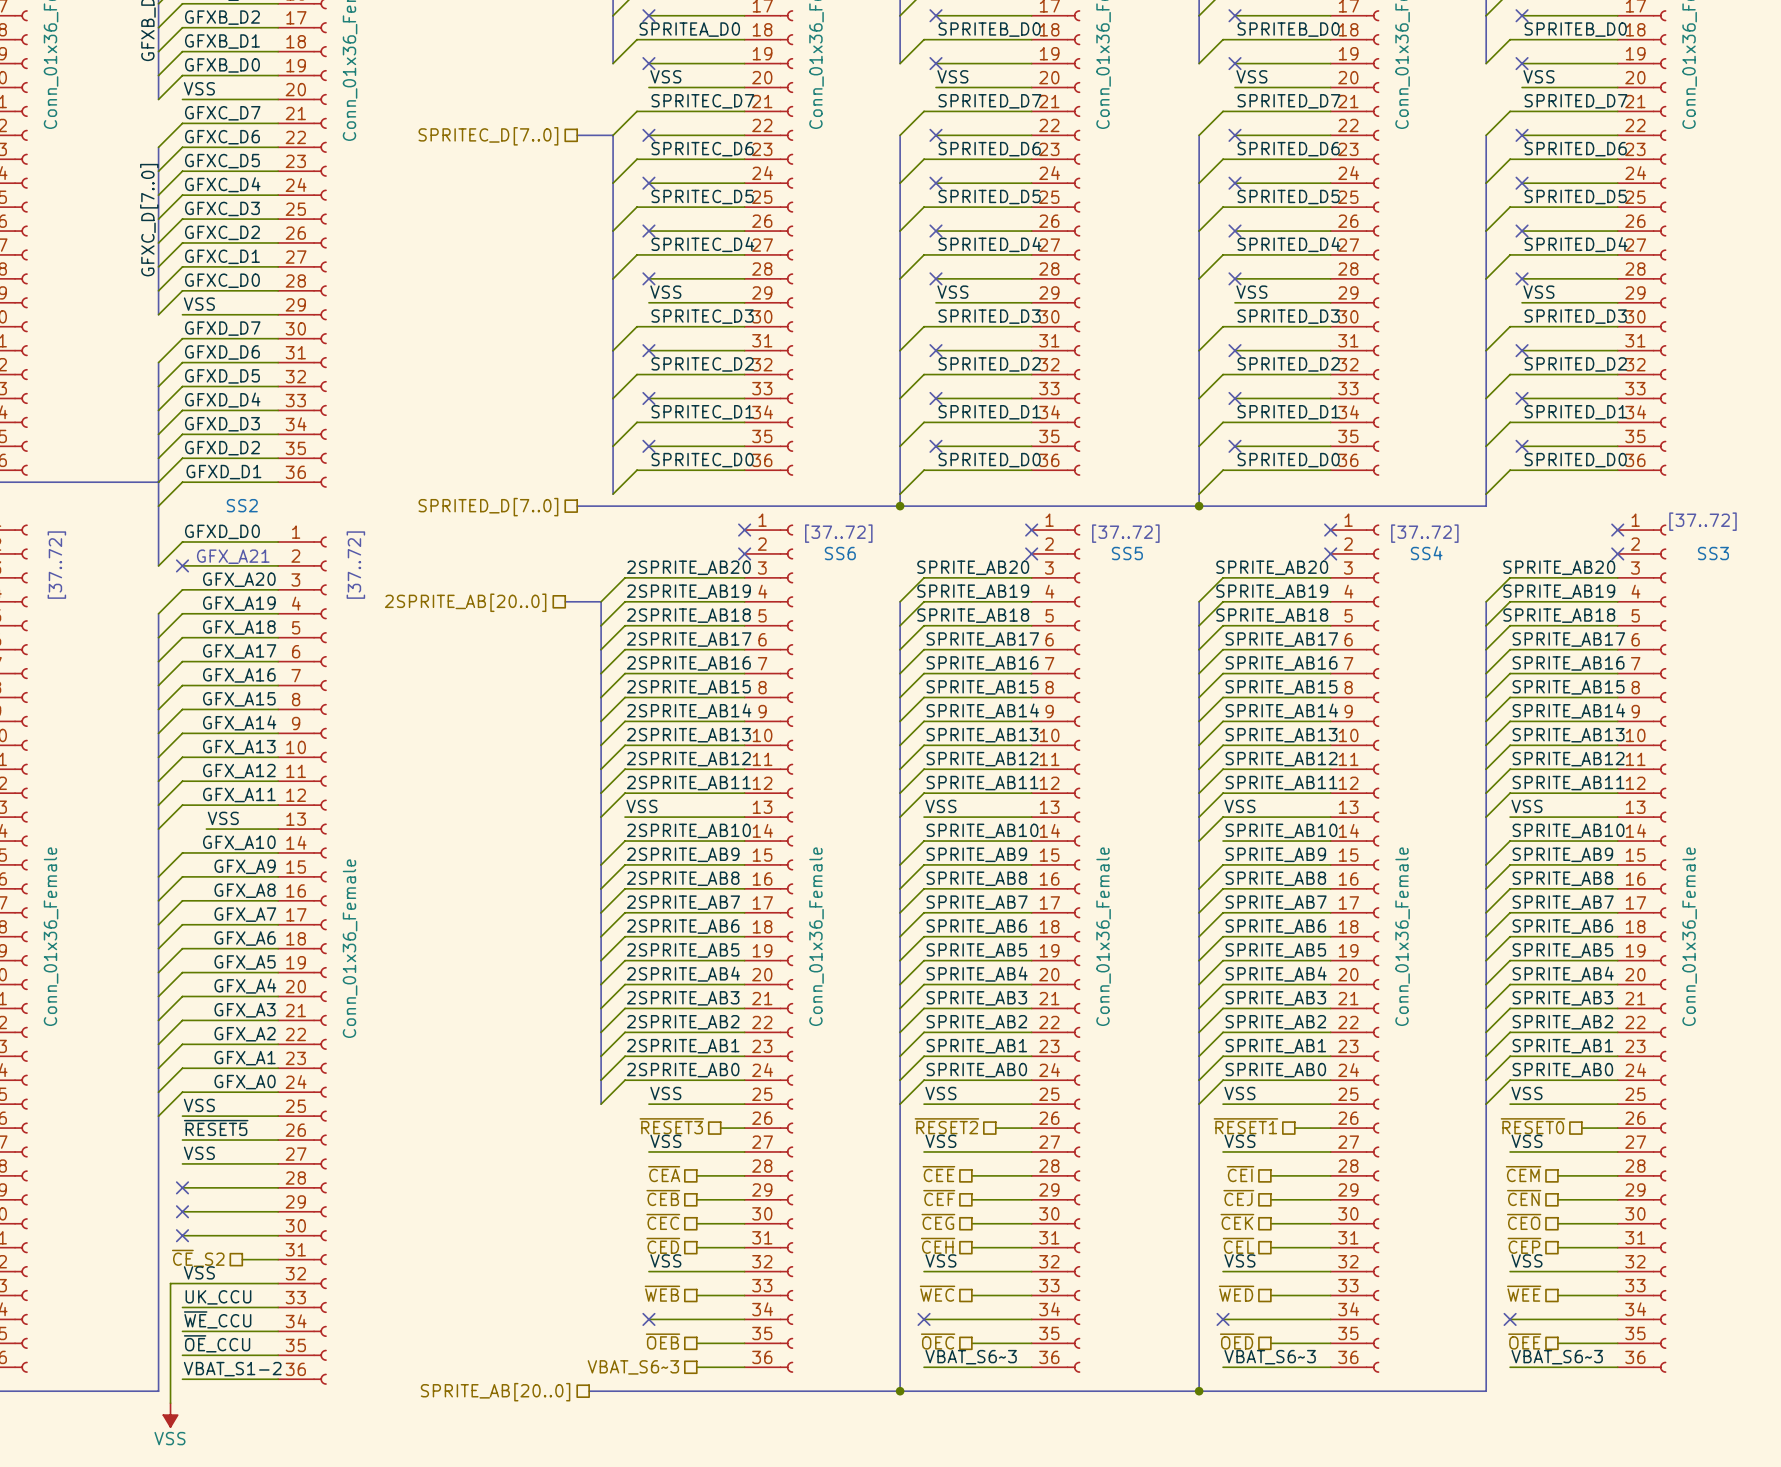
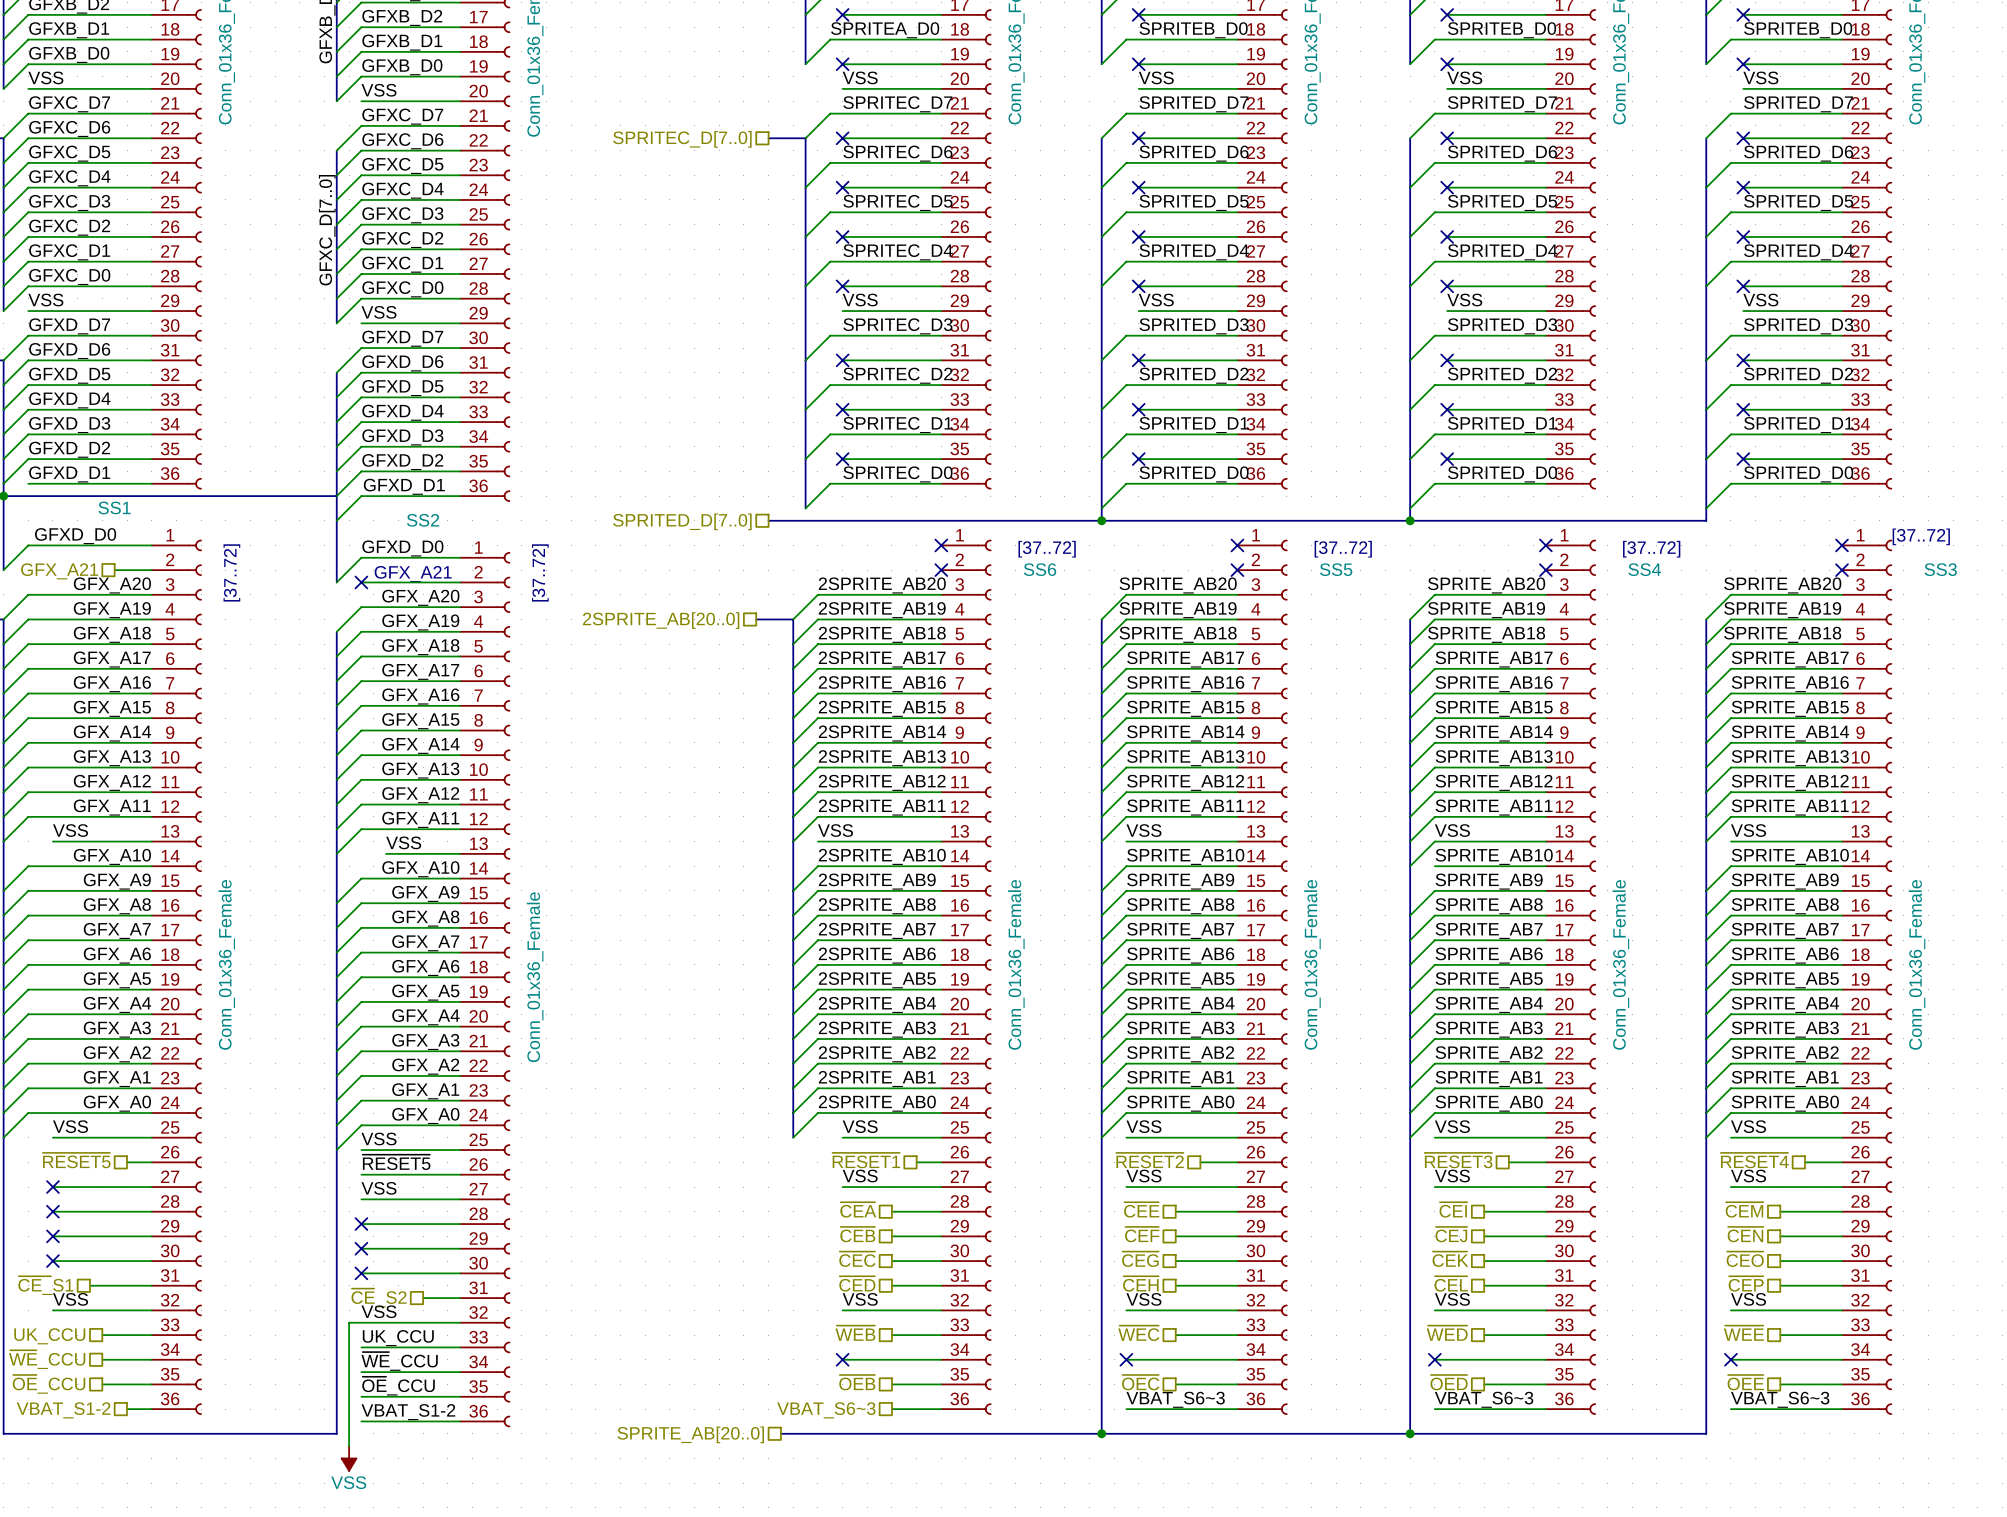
hierarchical label: ~{RESET3} (671, 1126) -> ~{RESET1} (866, 1160)
hierarchical label: ~{RESET1} (1245, 1126) -> ~{RESET3} (1458, 1160)
hierarchical label: ~{RESET0} (1532, 1126) -> ~{RESET4} (1754, 1160)

